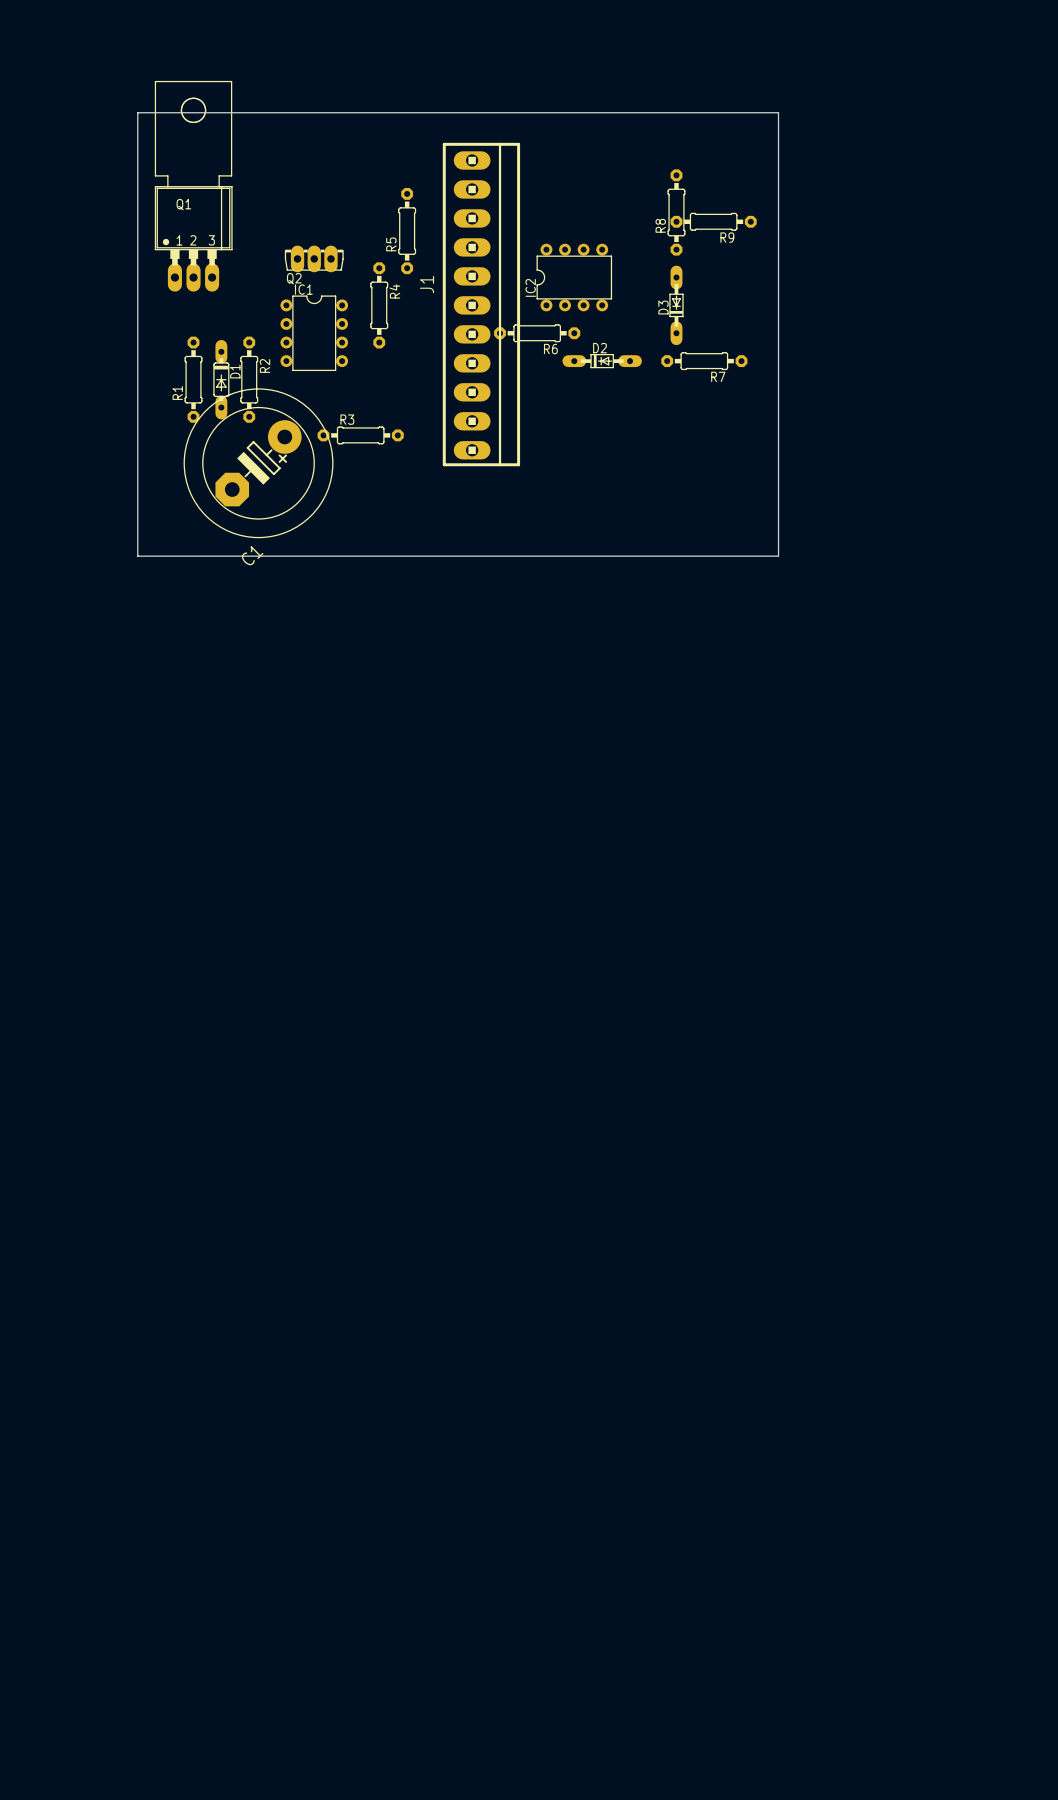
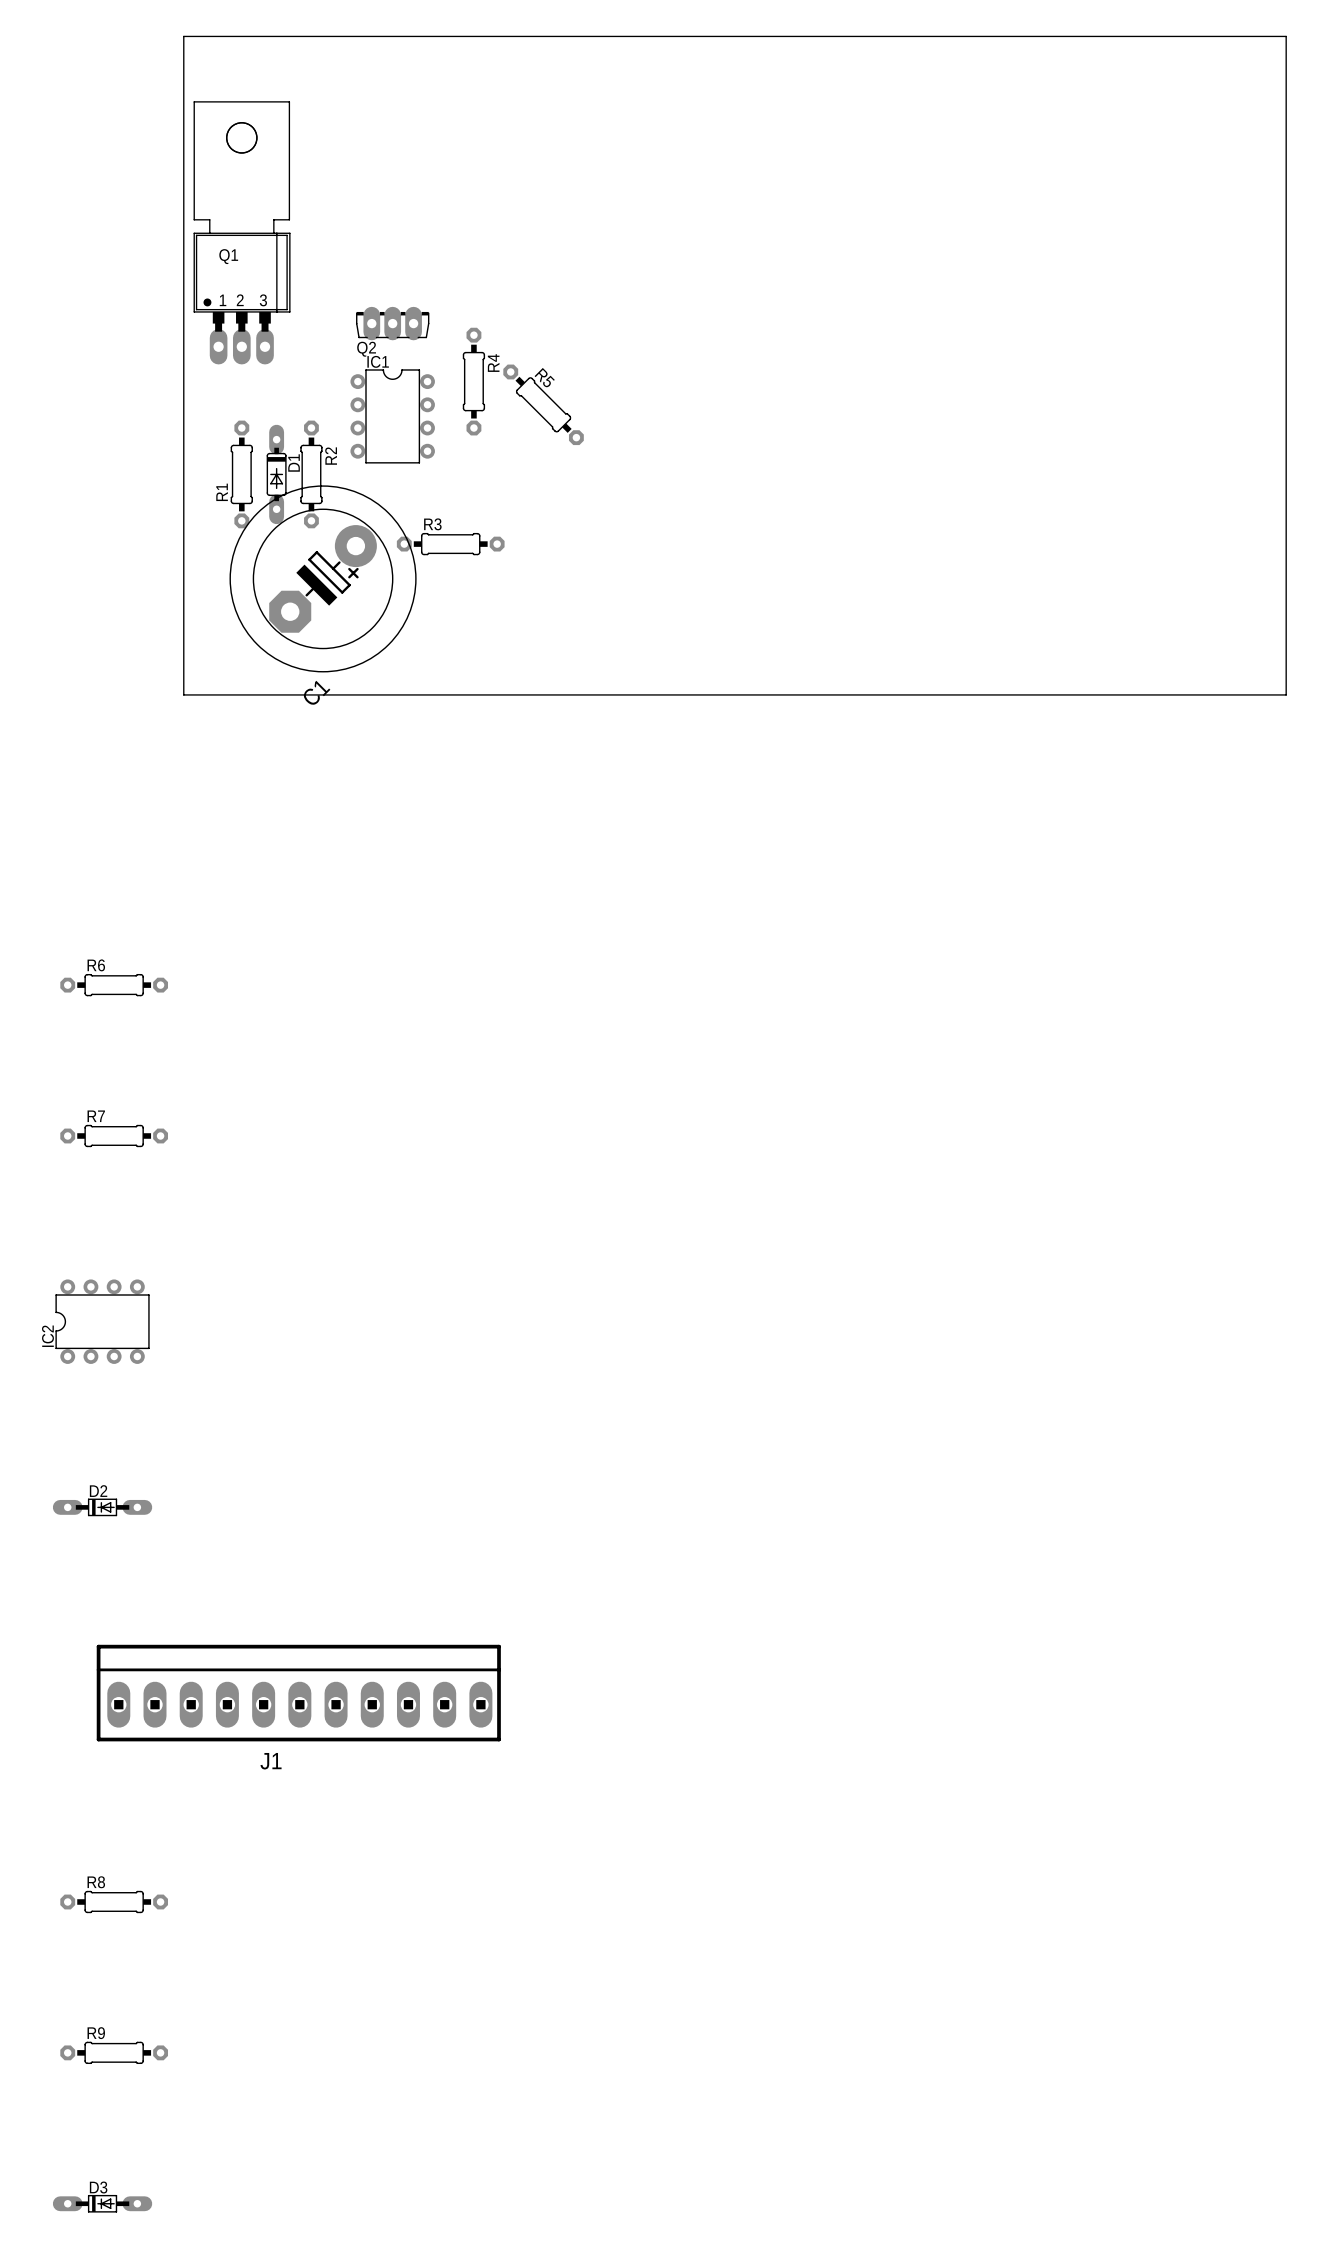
R8 rotation: 0° (676, 212) -> 90° clockwise (114, 1901)
R8 position: (676, 212) -> (114, 1901)
R9 position: (713, 221) -> (114, 2052)
R5 rotation: 0° (407, 231) -> 45° counterclockwise (543, 404)
R5 position: (407, 231) -> (543, 404)
R9 name position: R9 (727, 237) -> R9 (96, 2033)
R5 name position: R5 (391, 244) -> R5 (544, 377)
IC2 position: (574, 277) -> (102, 1321)
J1 rotation: 0° (481, 304) -> 90° counterclockwise (298, 1693)
J1 position: (481, 304) -> (298, 1693)
D3 rotation: 0° (676, 305) -> 90° clockwise (102, 2203)
D3 position: (676, 305) -> (102, 2203)
R6 position: (537, 333) -> (114, 985)
R6 name position: R6 (550, 349) -> R6 (96, 965)
D2 position: (602, 361) -> (102, 1507)
R7 position: (704, 361) -> (114, 1135)
R7 name position: R7 (718, 376) -> R7 (96, 1116)
board edge: (147, 556) (137, 556) (137, 112) (778, 112) (778, 556) -> (183, 694) (183, 36) (1286, 36) (1286, 694) (972, 694)

